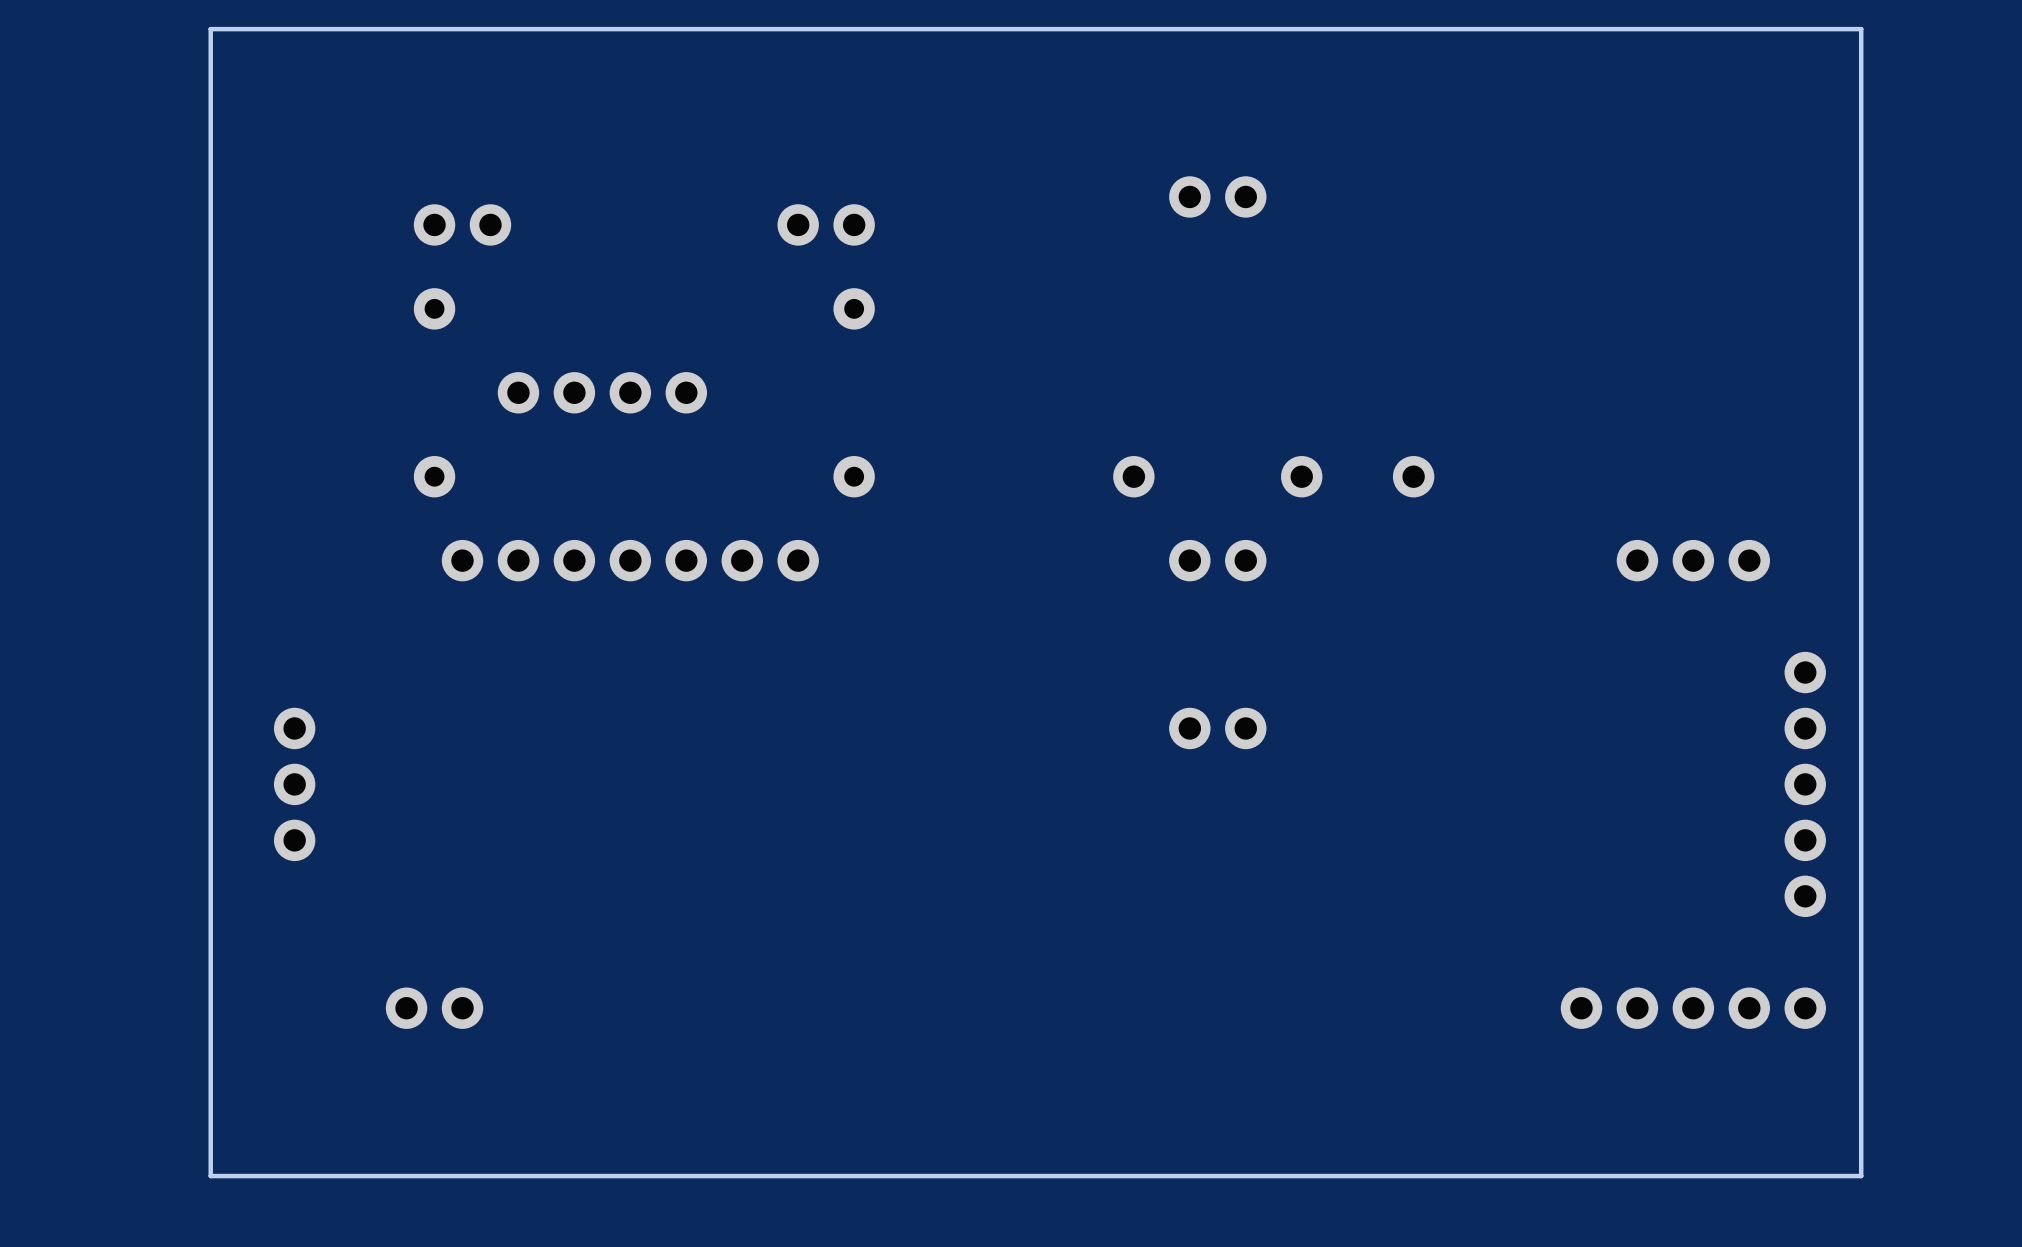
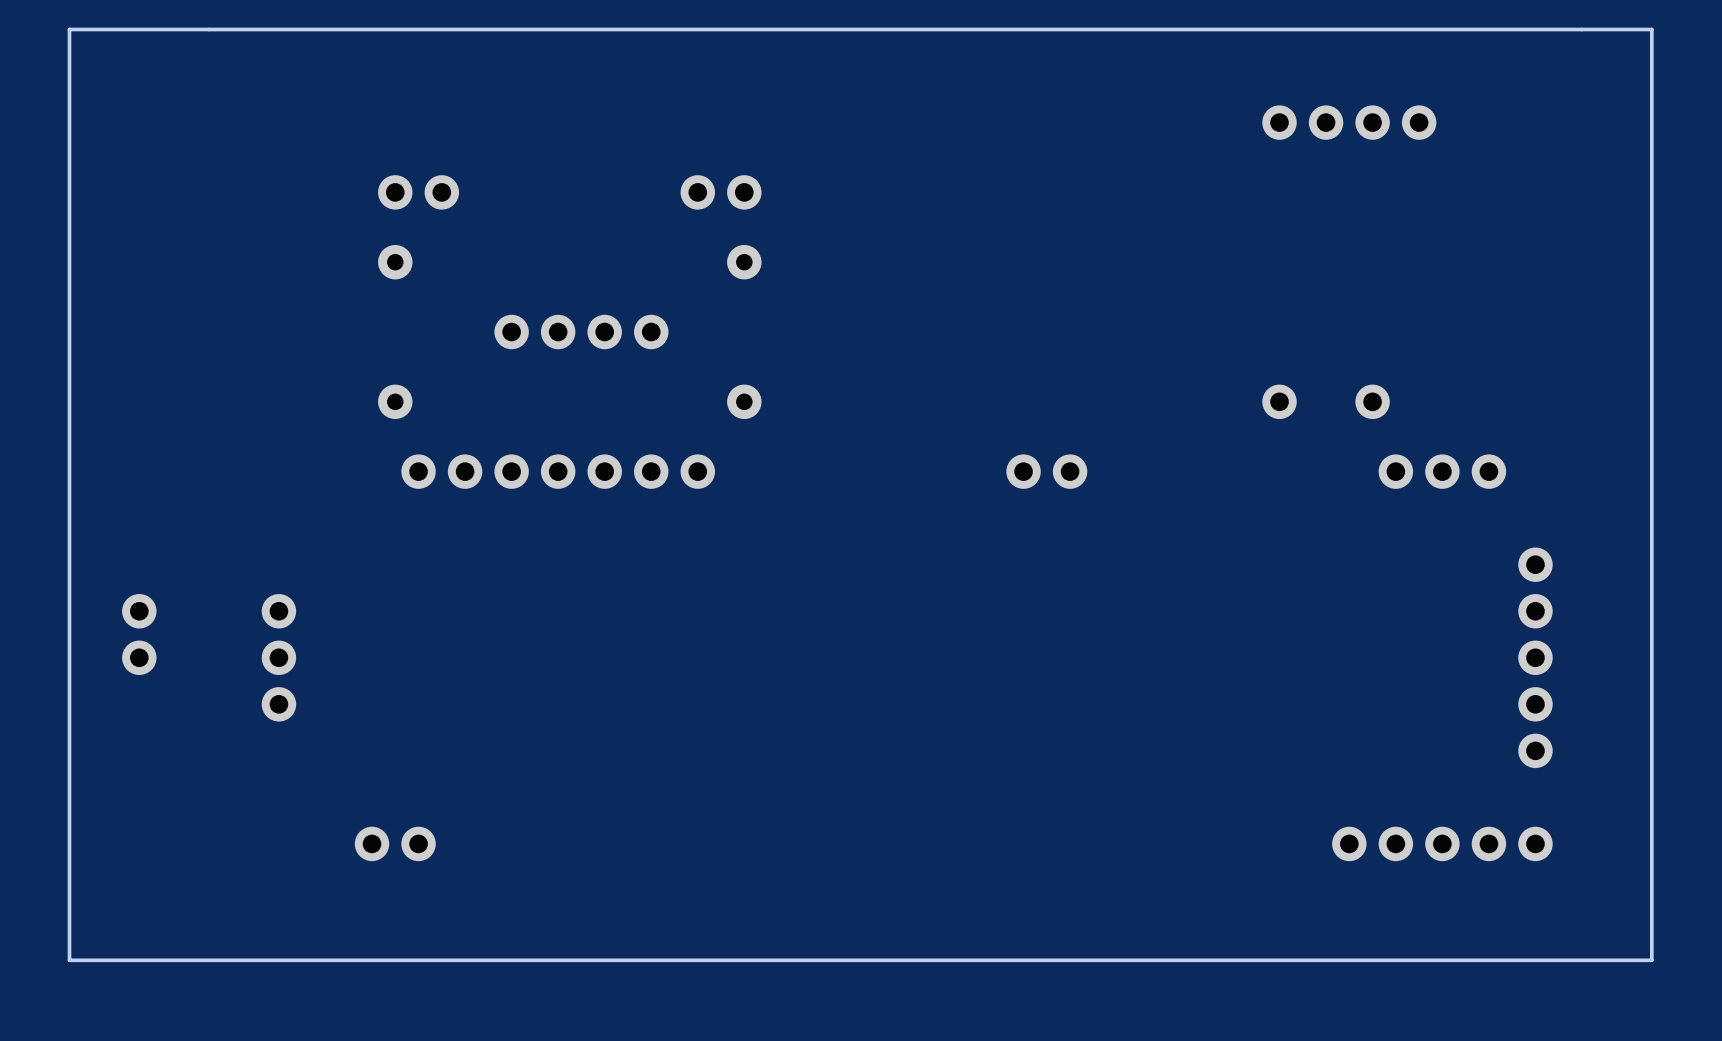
board edge: (1861, 29) (1861, 1176) (210, 1176) (210, 29) -> (1582, 29) (1651, 29) (1651, 960) (69, 960) (69, 29) (209, 29)
part: none -> (1279, 122)
part: none -> (1326, 122)
part: none -> (1372, 122)
part: none -> (1419, 122)
part: (1189, 196) -> none
part: (1245, 196) -> none
part position: (602, 392) -> (581, 332)
part: (1133, 476) -> none
part: (1301, 476) -> none
part position: (1413, 476) -> (1279, 401)
part: none -> (1372, 401)
part: (1189, 728) -> none
part: (1245, 728) -> none
part: none -> (139, 634)

